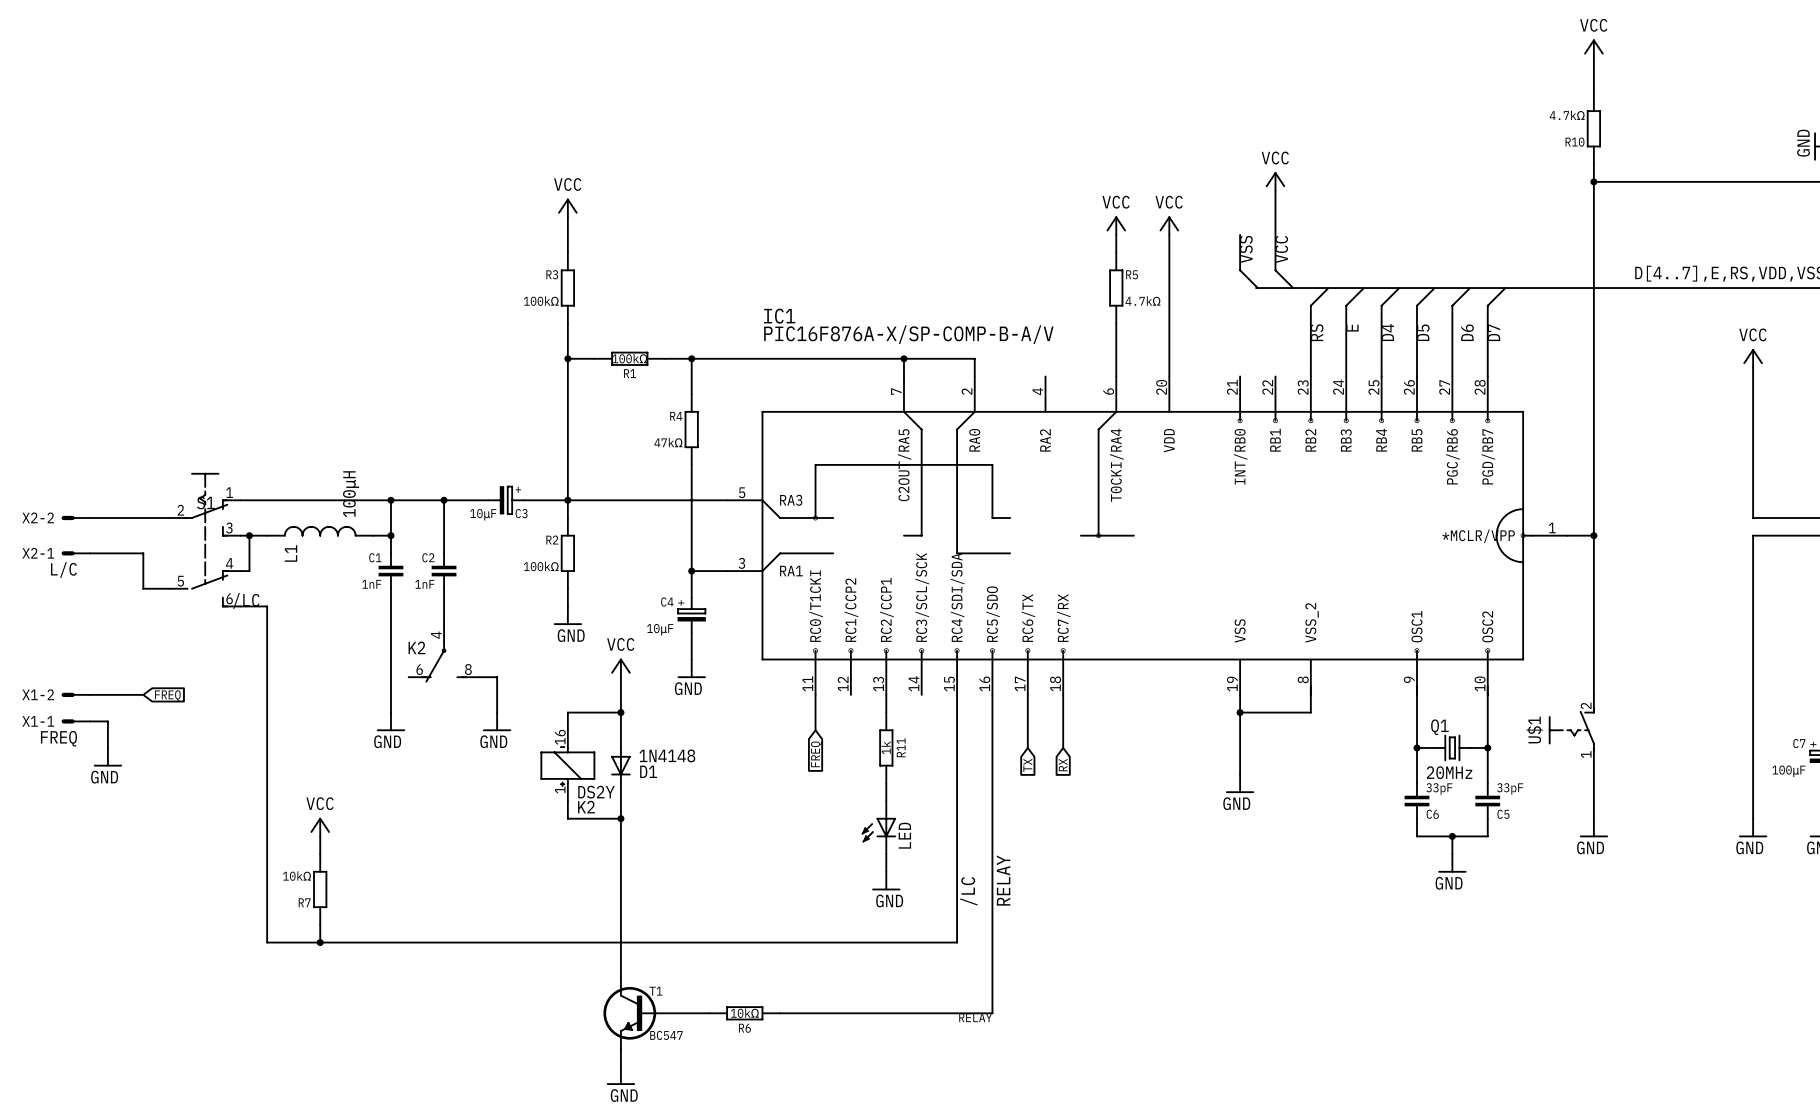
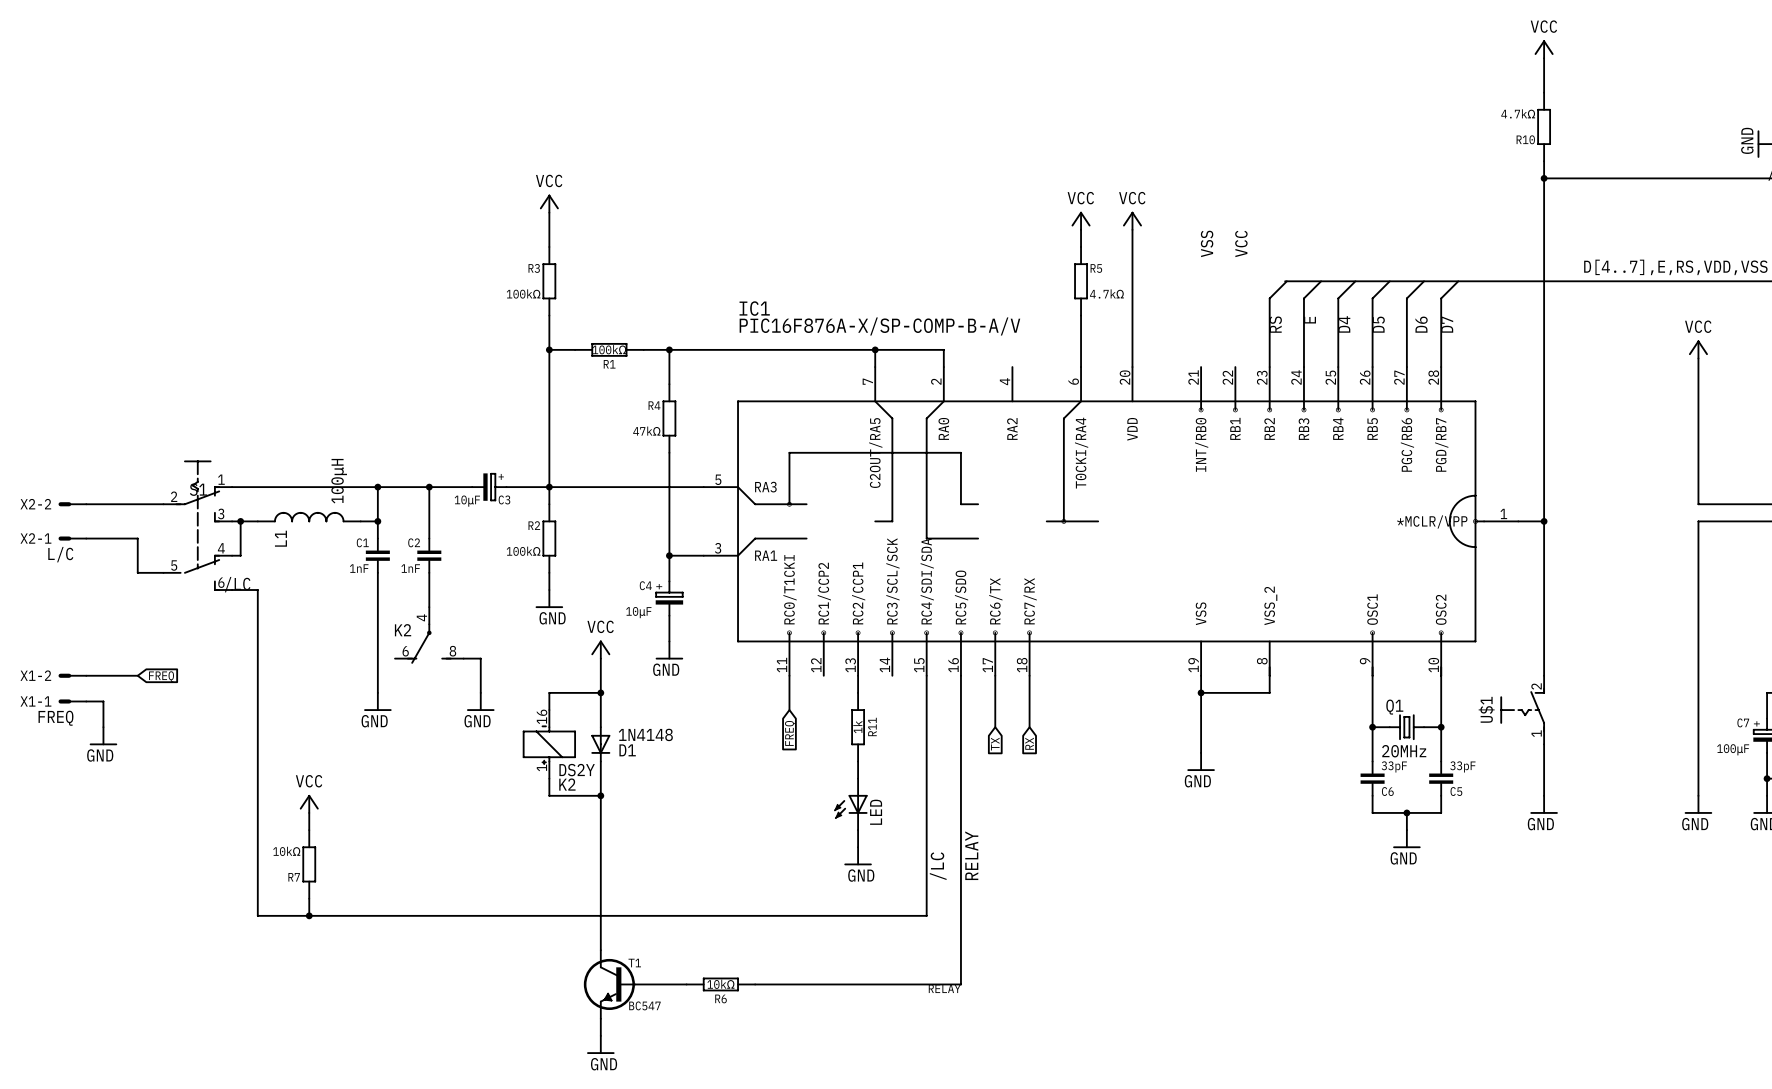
power symbol: VCC (1275, 181) -> none
wire: (1275, 190) (1275, 270) (1293, 288) -> none
wire: (1240, 234) (1240, 270) (1257, 288) -> none
bus: (1256, 288) (1326, 288) -> none

